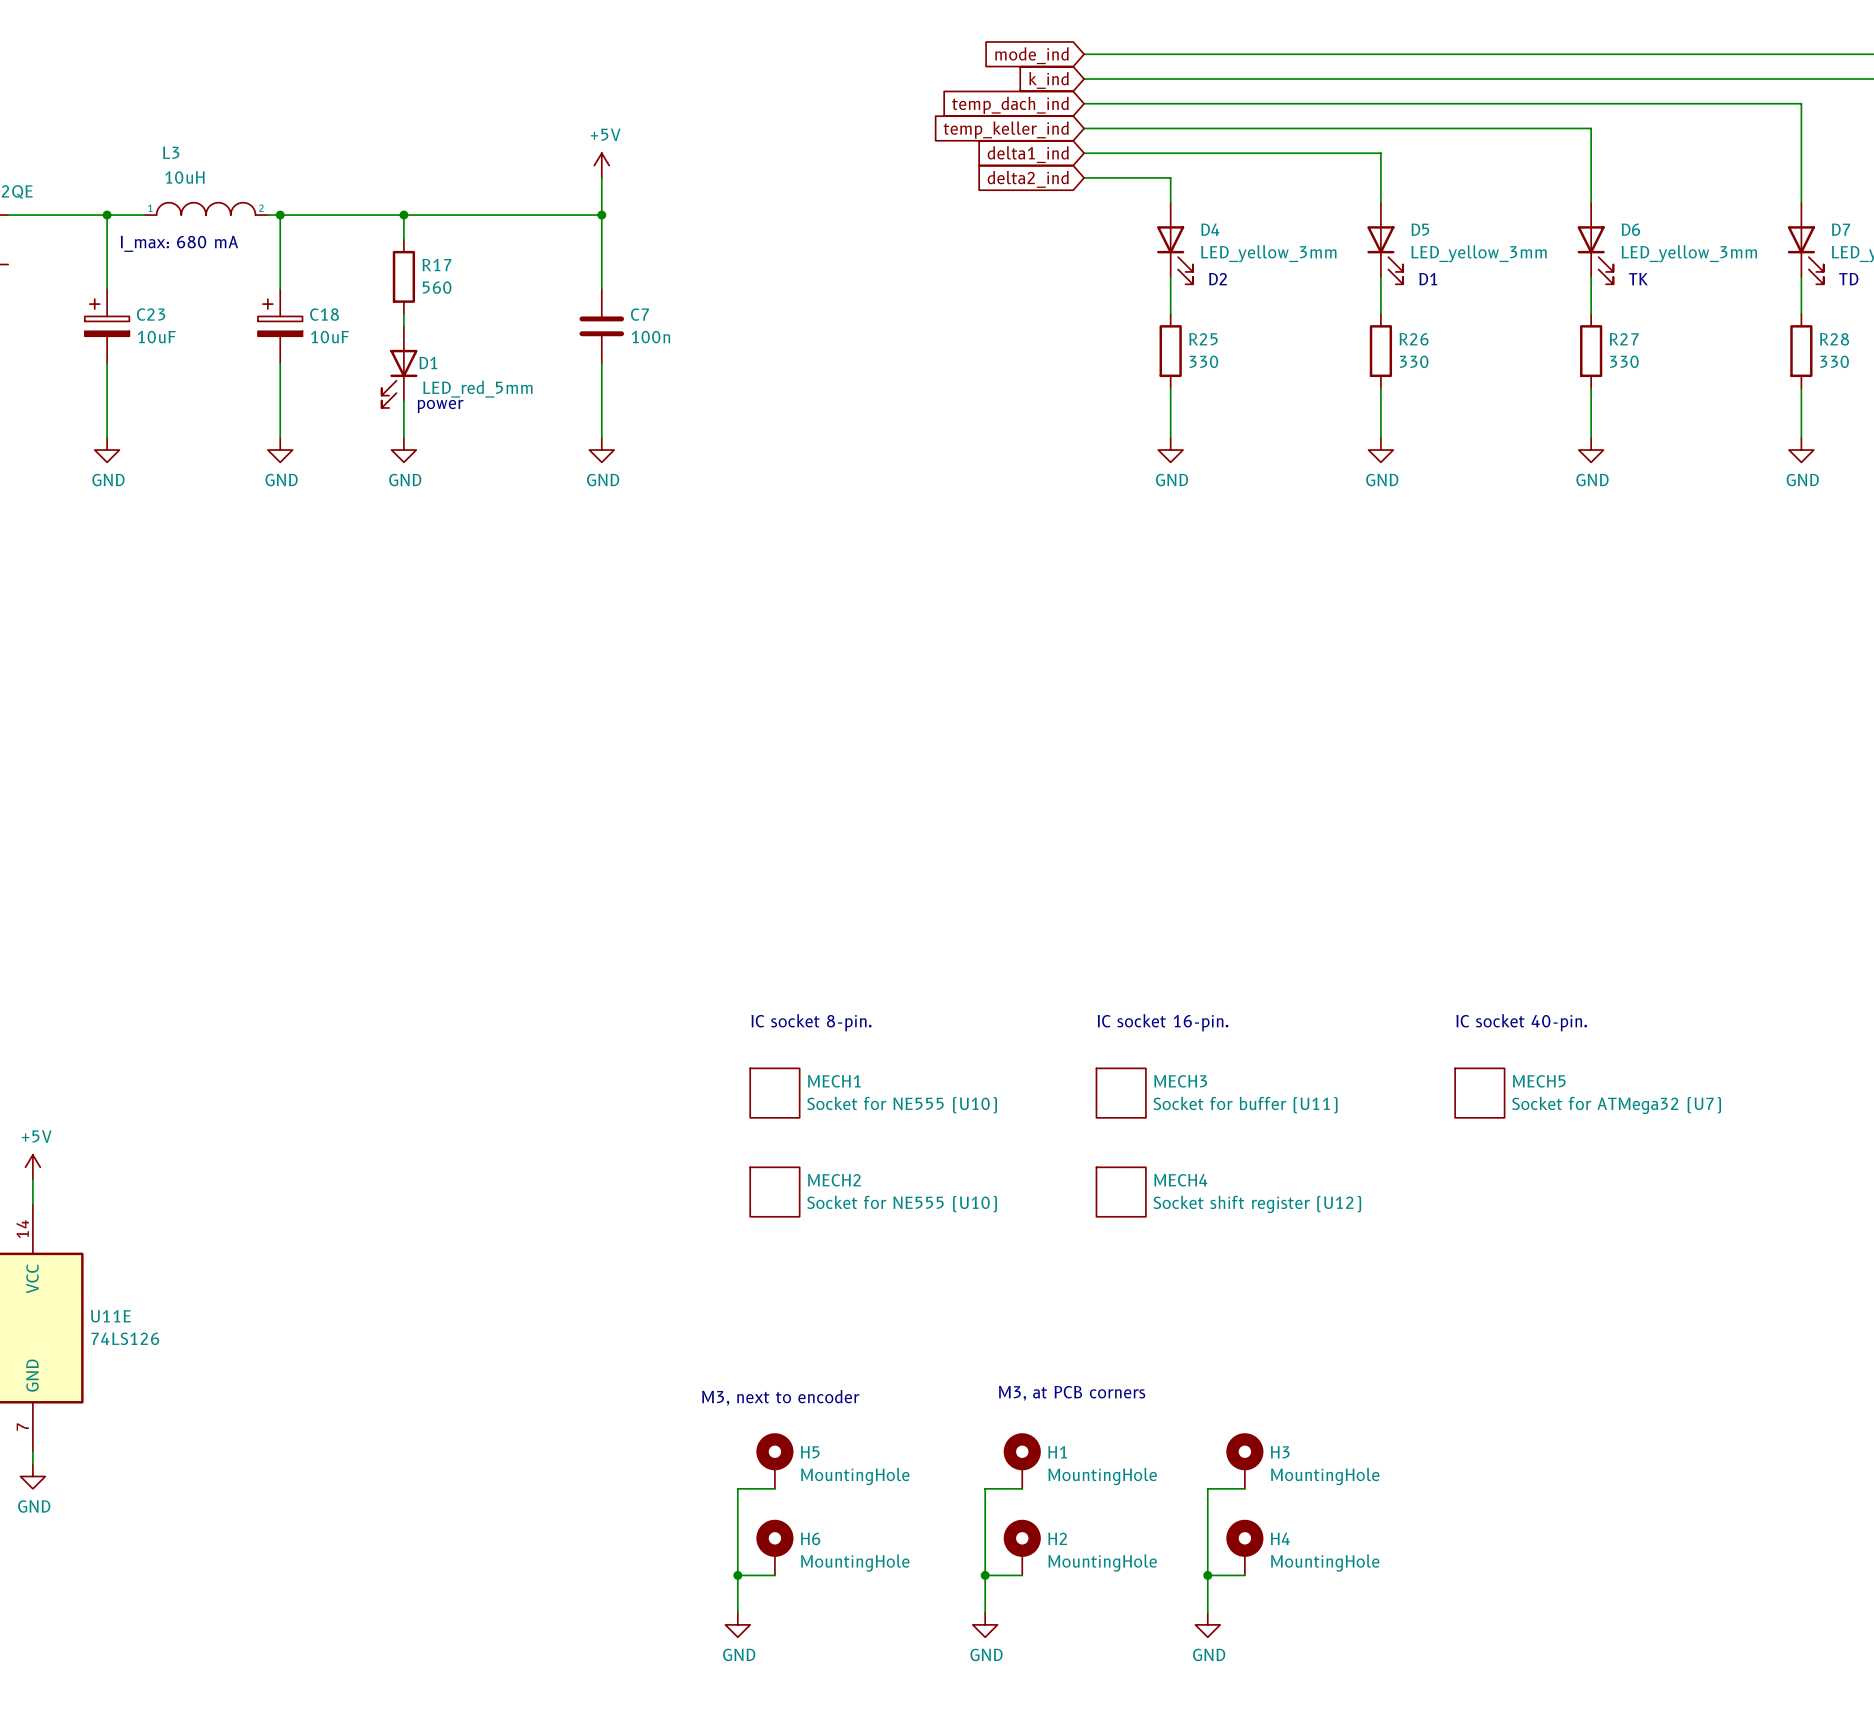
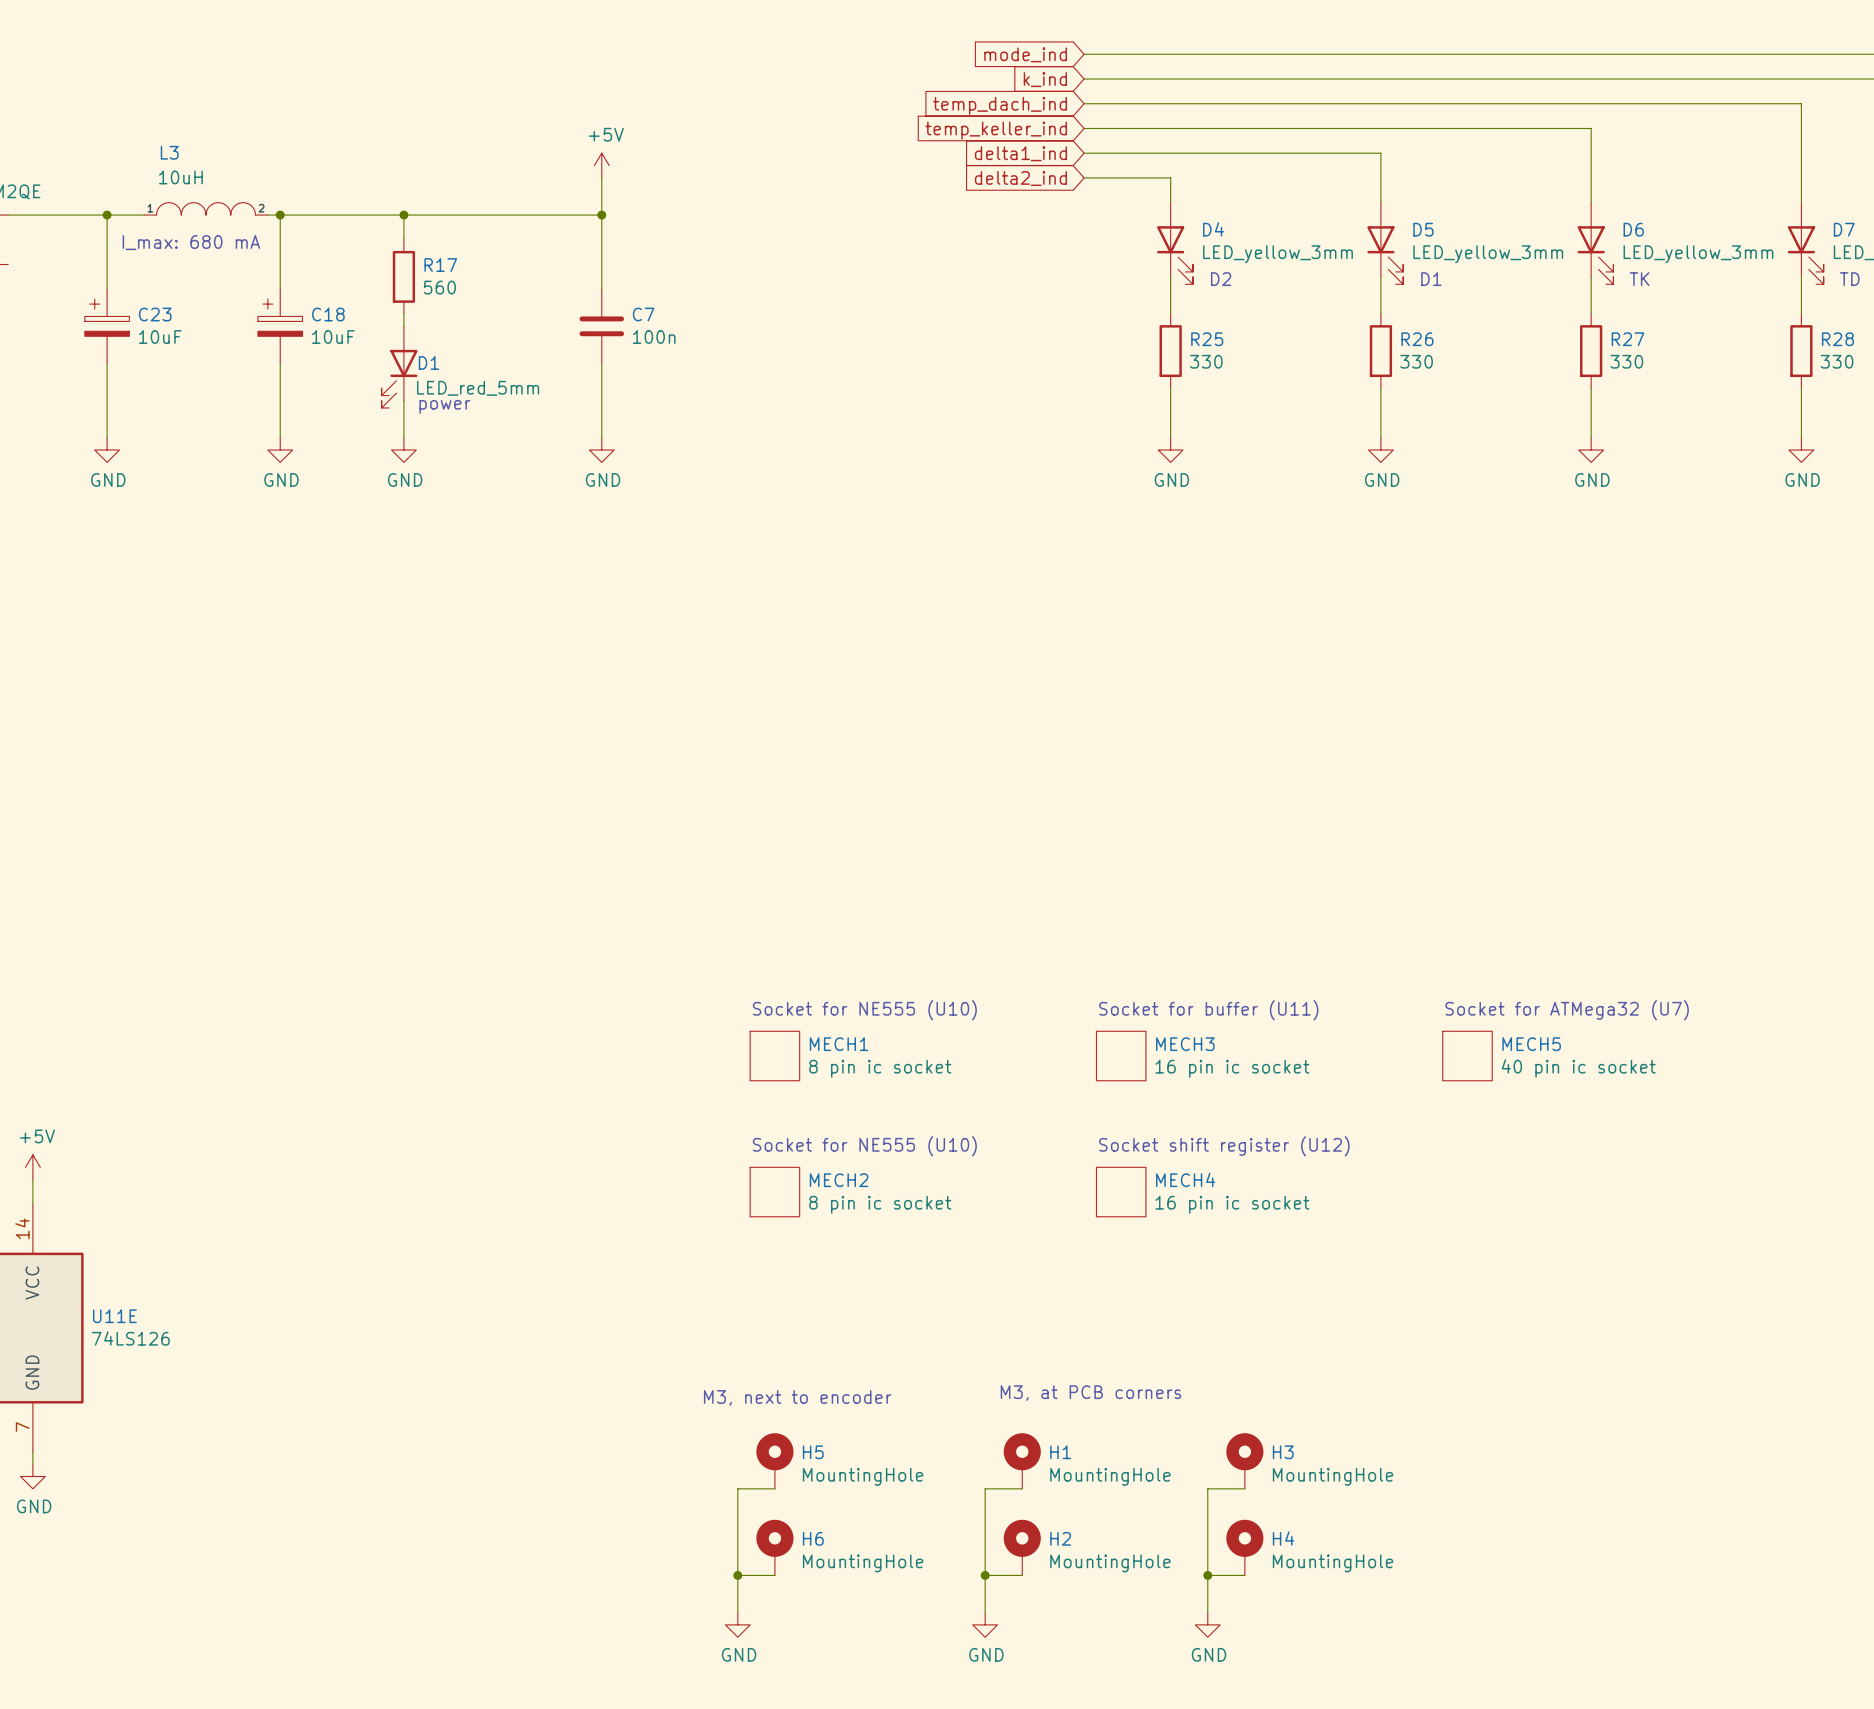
text: none -> Socket for NE555 (U10) (864, 1010)
text: none -> Socket for buffer (U11) (1208, 1010)
text: none -> Socket for ATMega32 (U7) (1567, 1010)
text: IC socket 8-pin. (811, 1022) -> none
text: IC socket 16-pin. (1163, 1022) -> none
text: IC socket 40-pin. (1521, 1022) -> none
MECH1 position: (774, 1093) -> (774, 1056)
MECH3 position: (1121, 1093) -> (1121, 1056)
MECH5 position: (1479, 1093) -> (1467, 1056)
MECH1 value: Socket for NE555 (U10) (902, 1105) -> 8 pin ic socket (880, 1068)
MECH3 value: Socket for buffer (U11) (1245, 1105) -> 16 pin ic socket (1232, 1068)
MECH5 value: Socket for ATMega32 (U7) (1616, 1105) -> 40 pin ic socket (1578, 1068)
text: none -> Socket for NE555 (U10) (864, 1146)
text: none -> Socket shift register (U12) (1224, 1146)
MECH2 value: Socket for NE555 (U10) (902, 1204) -> 8 pin ic socket (880, 1204)
MECH4 value: Socket shift register (U12) (1257, 1204) -> 16 pin ic socket (1232, 1204)

